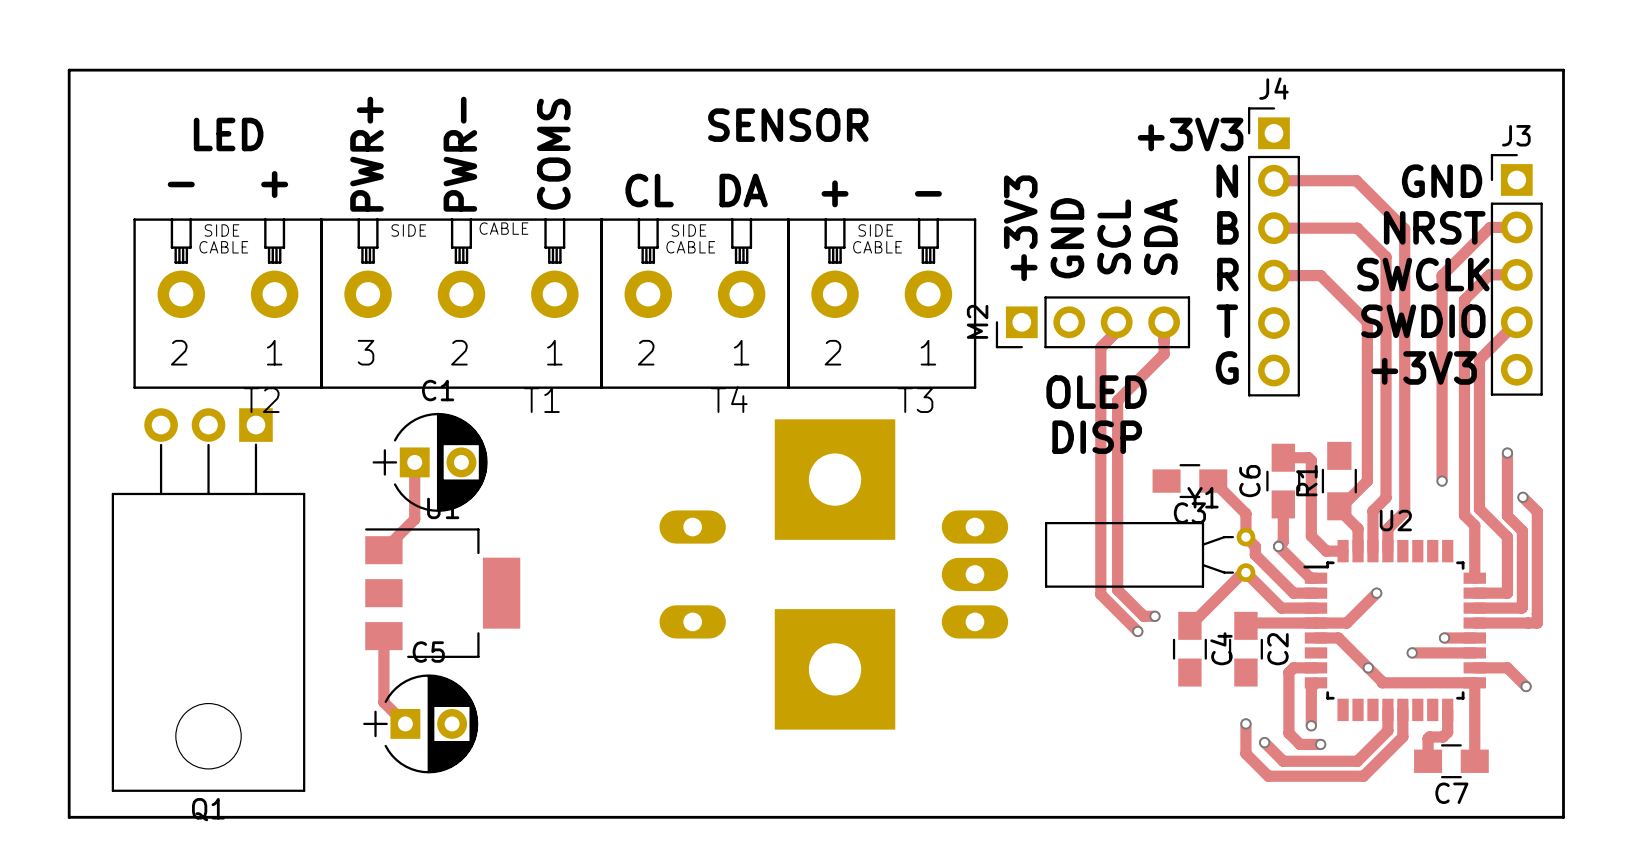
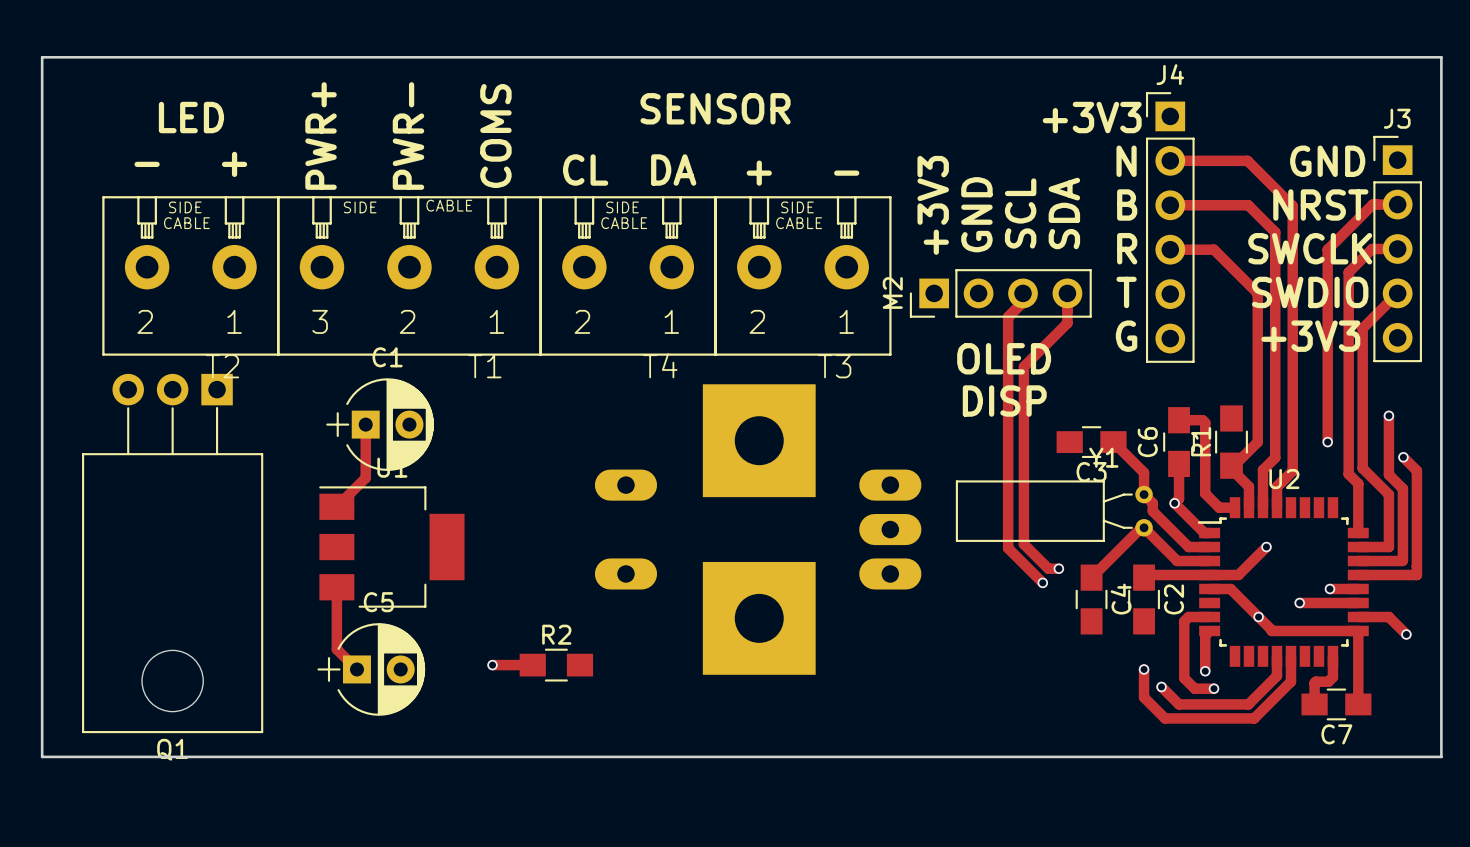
track: none -> (492, 665) (532, 665)
via: none -> (492, 665)
R2: none -> (556, 665)

